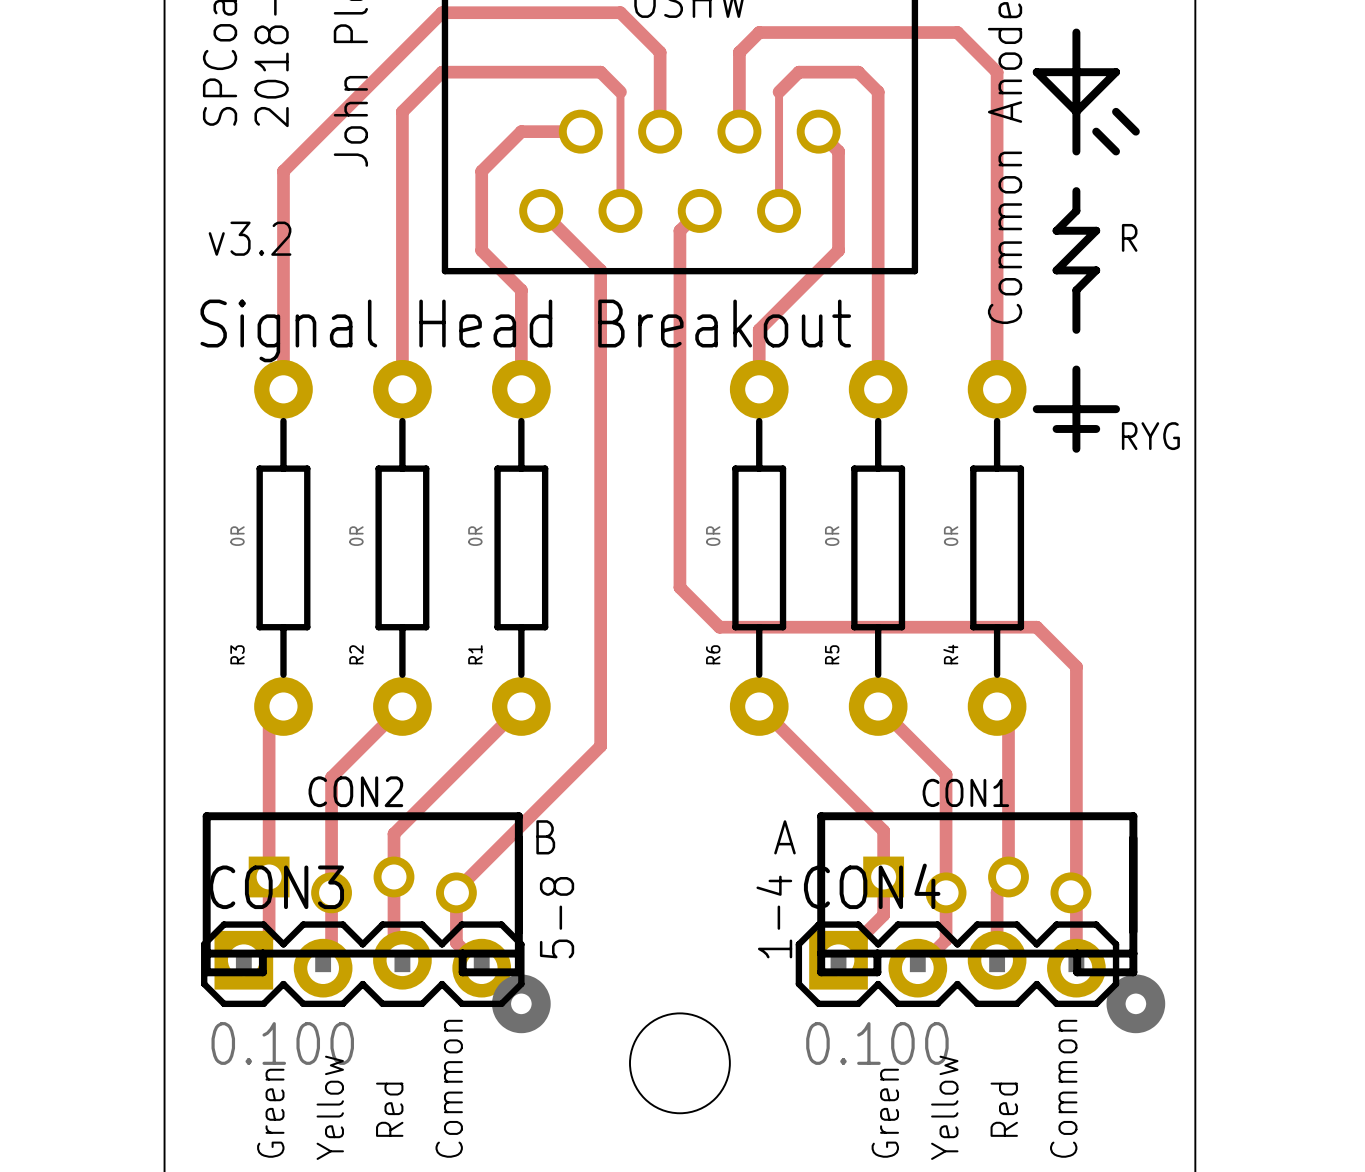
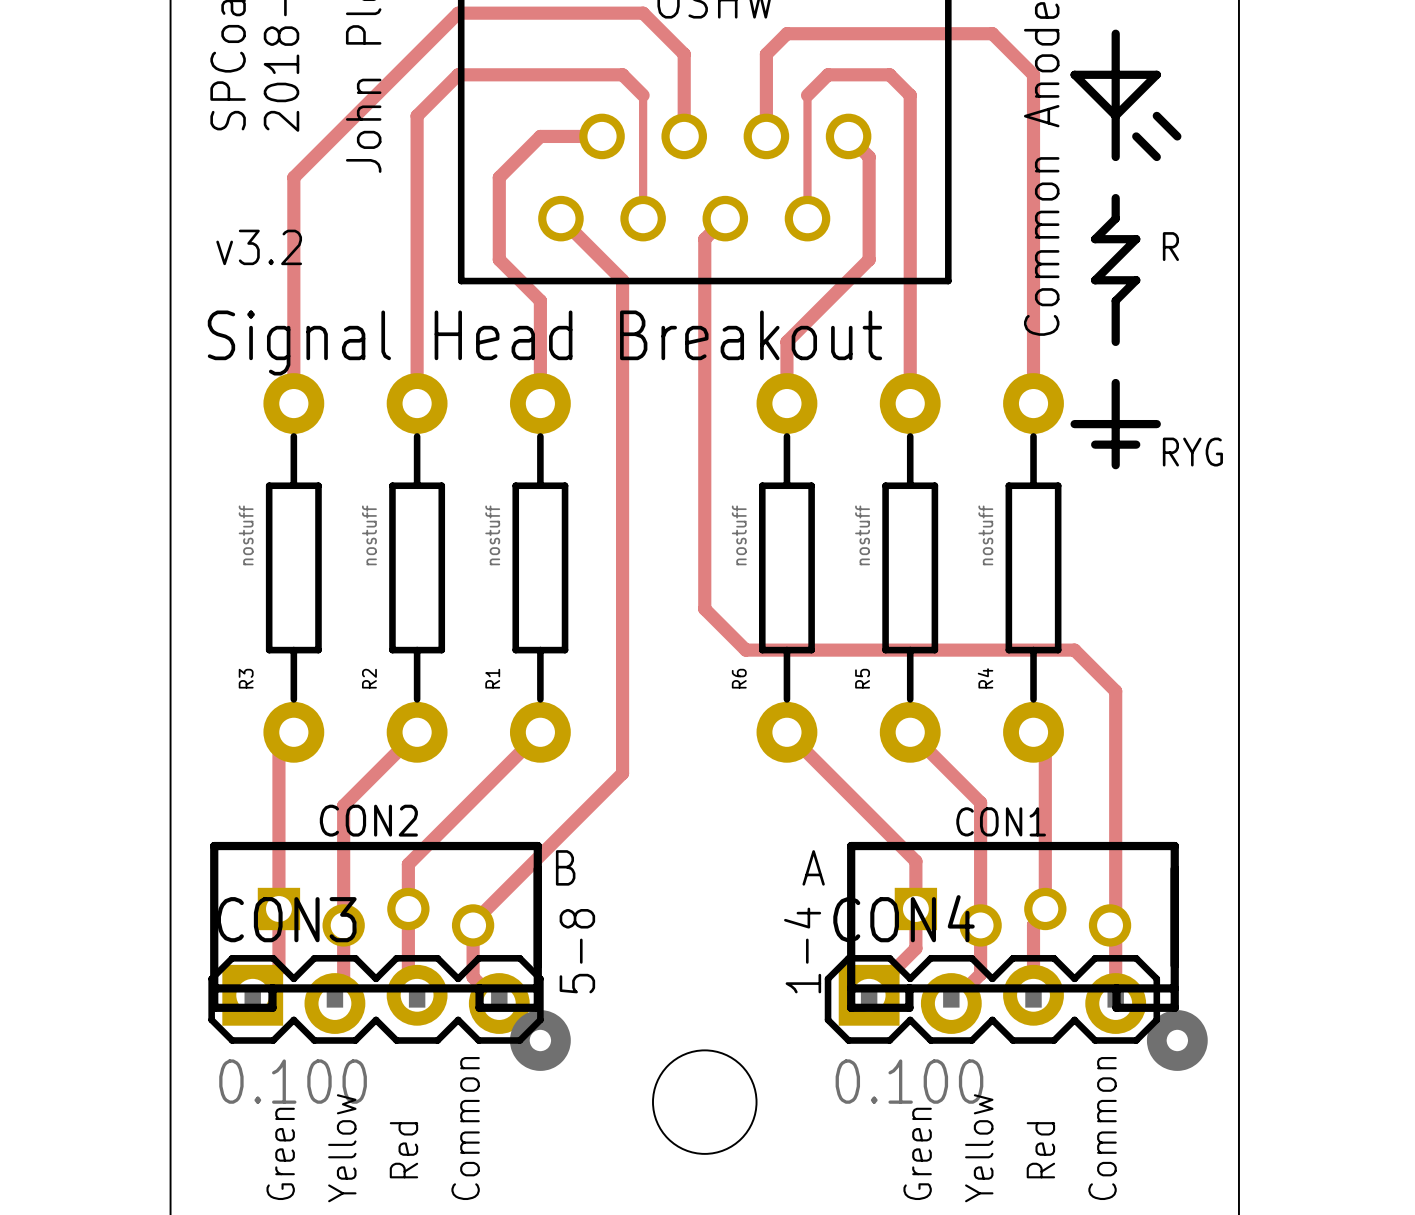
R3 value: 0R (237, 536) -> nostuff (246, 535)
R2 value: 0R (356, 536) -> nostuff (369, 535)
R1 value: 0R (475, 536) -> nostuff (492, 535)
R6 value: 0R (713, 536) -> nostuff (739, 535)
R5 value: 0R (832, 536) -> nostuff (862, 535)
R4 value: 0R (951, 536) -> nostuff (985, 535)

